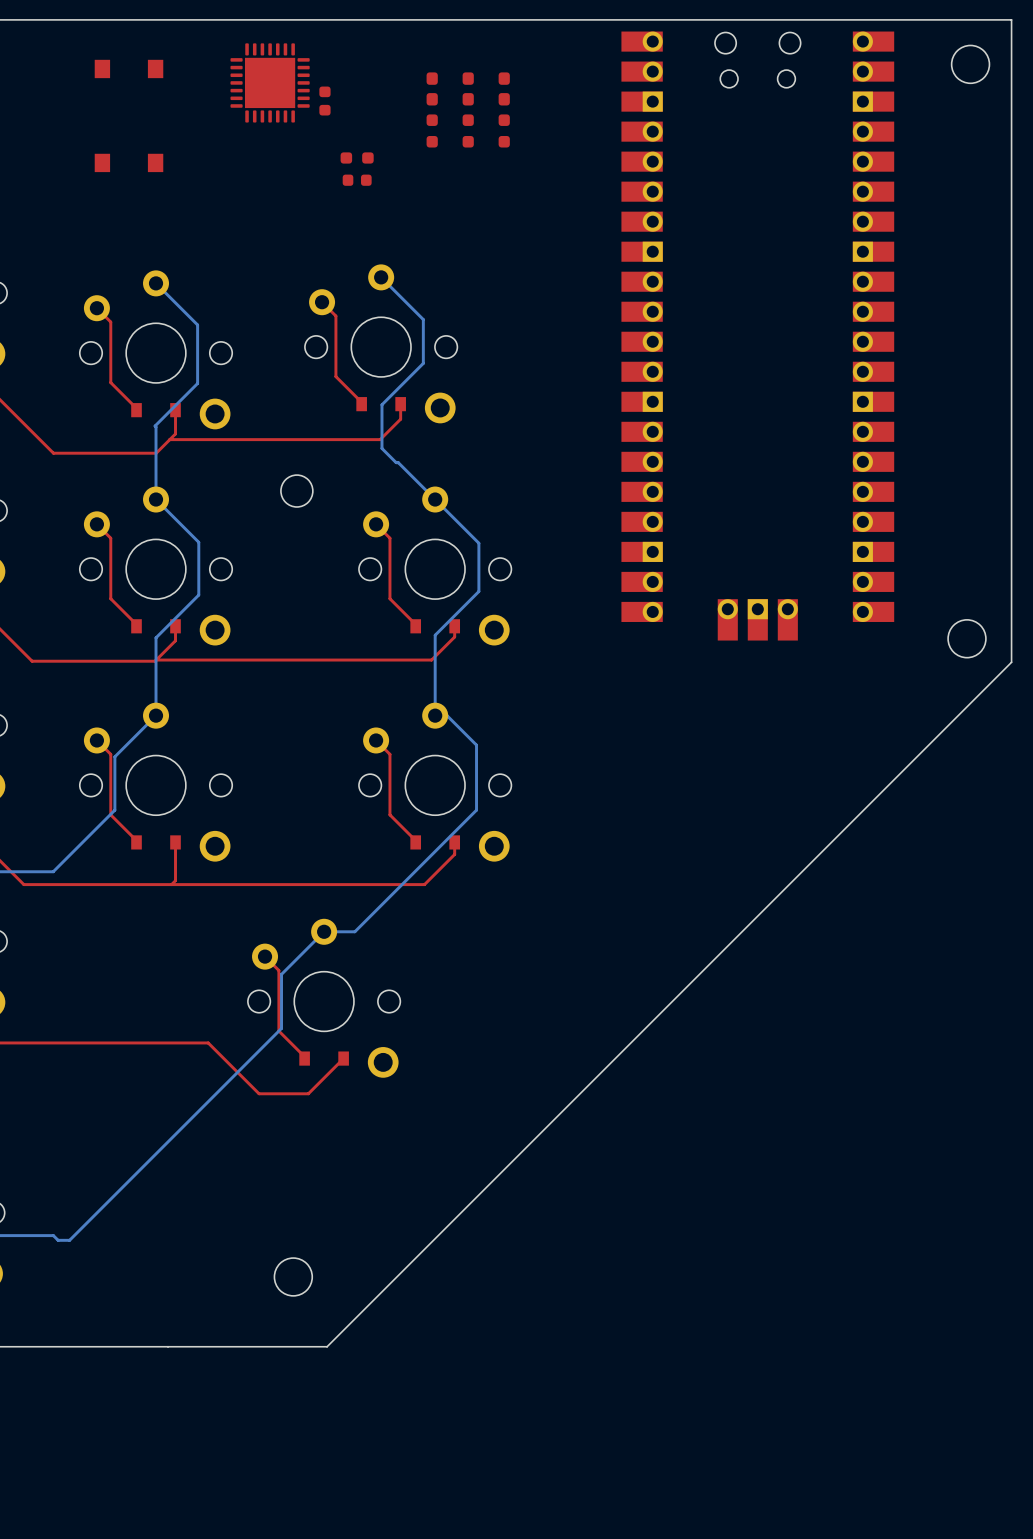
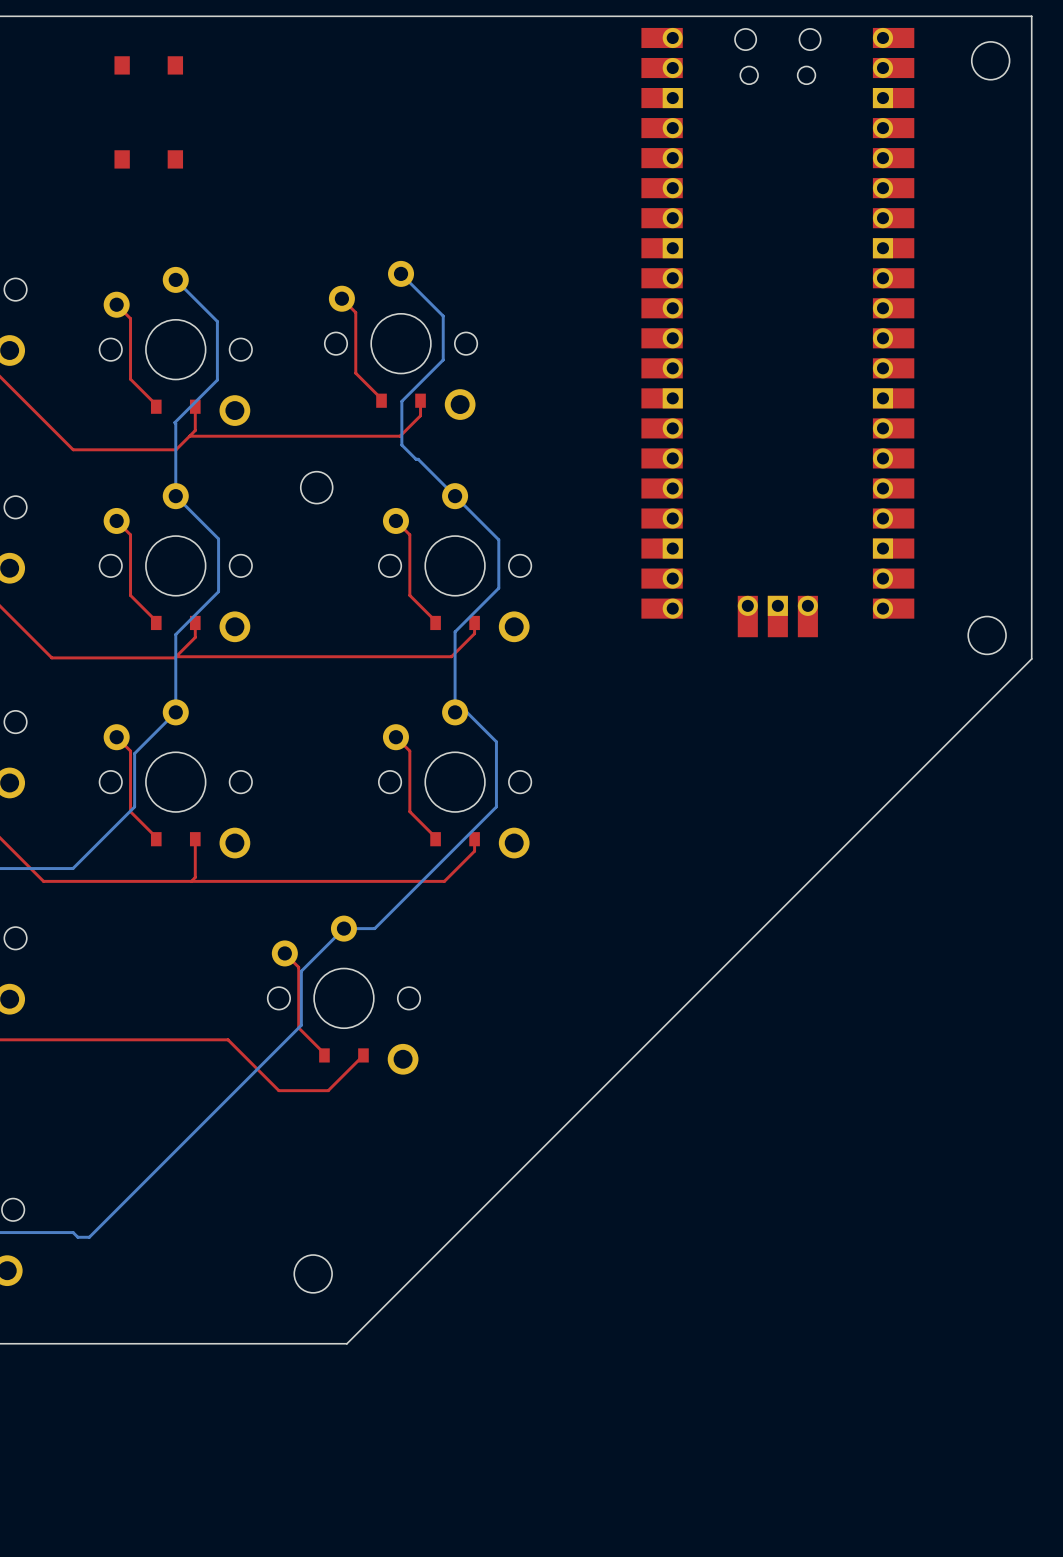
part: (270, 82) -> none
part: (432, 88) -> none
part: (468, 88) -> none
part: (504, 88) -> none
part: (324, 101) -> none
part: (432, 130) -> none
part: (468, 130) -> none
part: (504, 130) -> none
part: (357, 157) -> none
part: (357, 180) -> none

